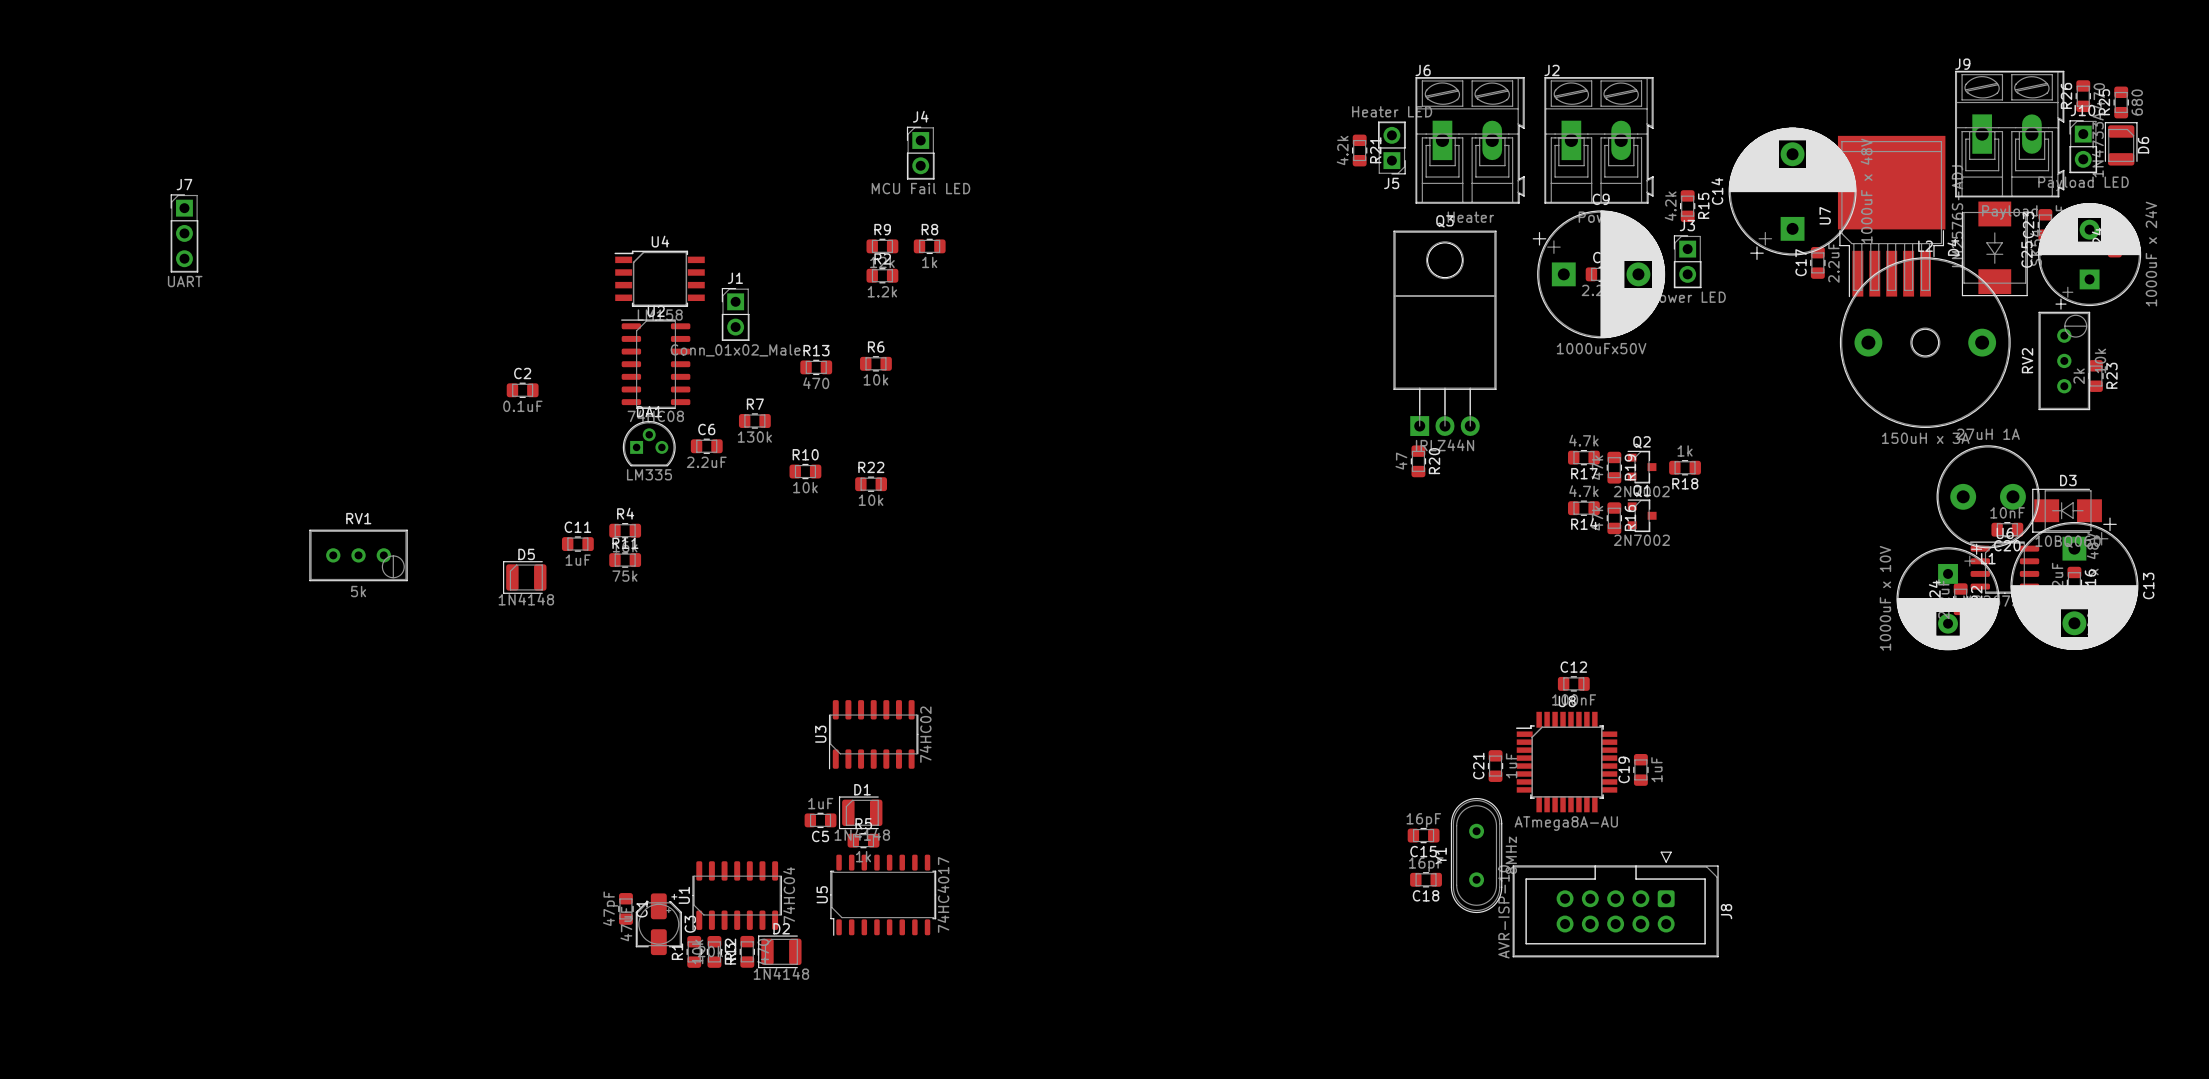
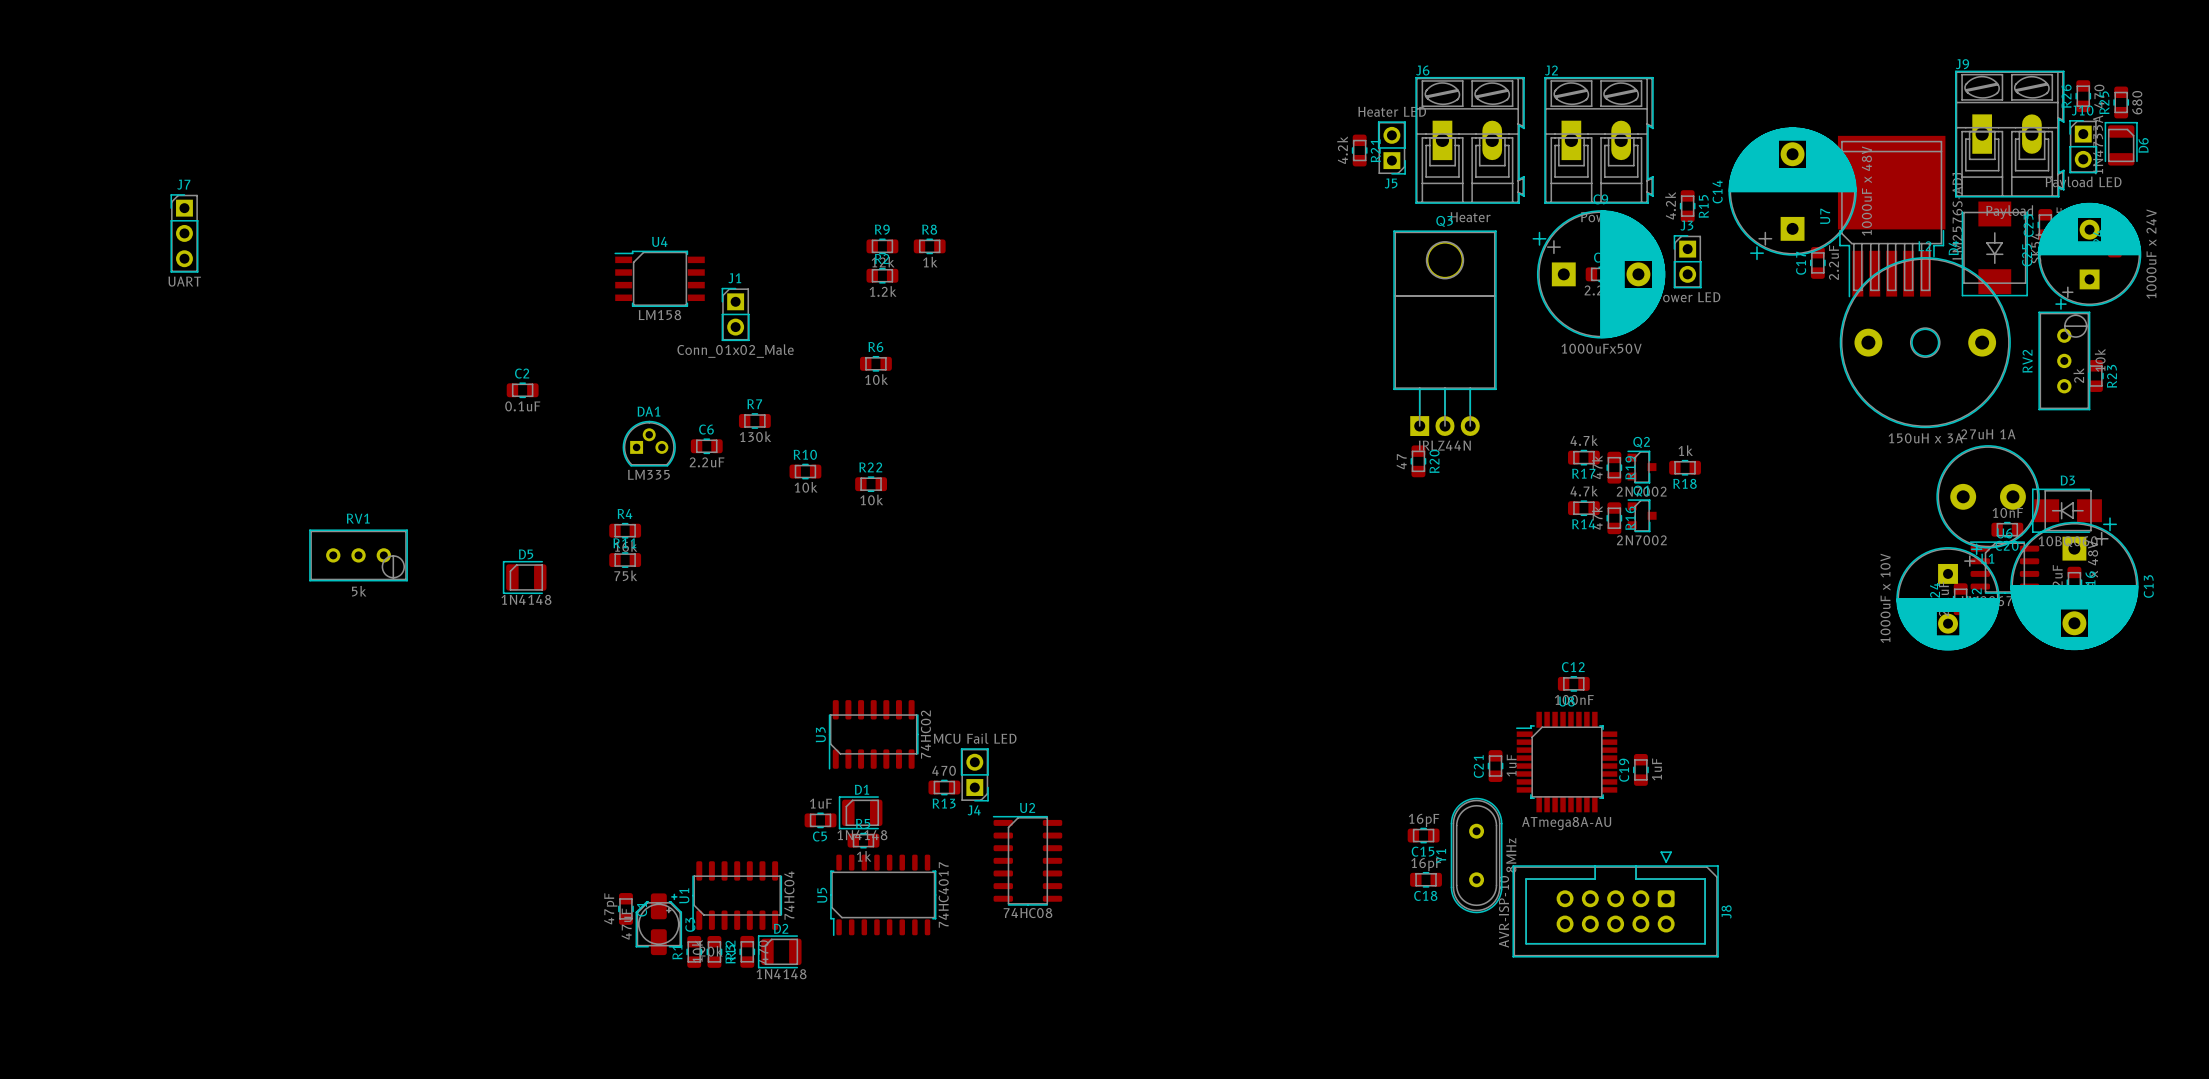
J4 rotation: 0° (920, 153) -> 180° (974, 774)
J4 position: (920, 153) -> (974, 774)
R13 name position: R13 (816, 350) -> R13 (944, 803)
U2 position: (655, 364) -> (1027, 860)
R13 position: (816, 367) -> (944, 787)
R13 value position: 470 (816, 383) -> 470 (944, 770)
C11: 1uF (577, 544) -> none

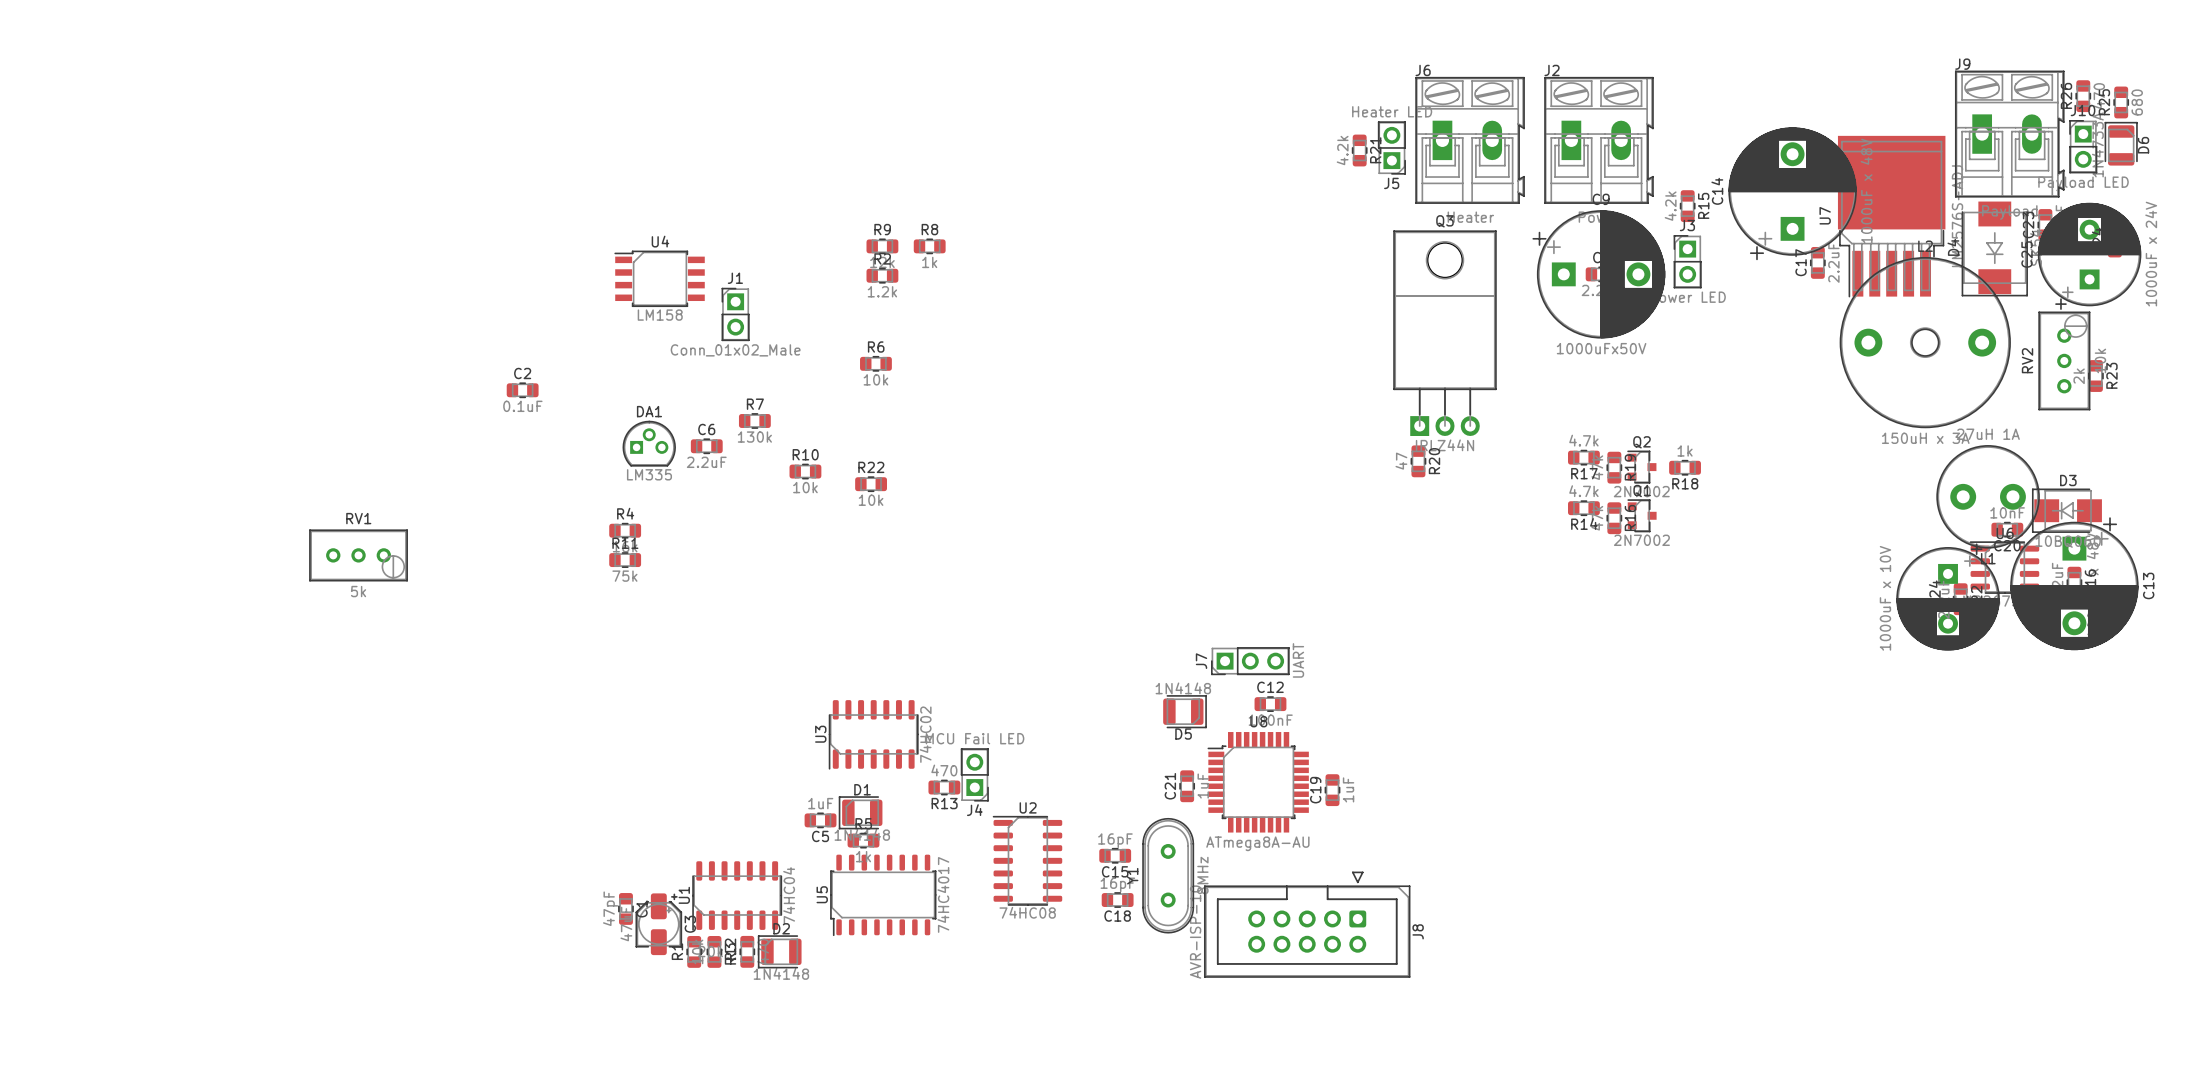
J7 rotation: 0° (184, 233) -> 90° counterclockwise (1250, 661)
J7 position: (184, 233) -> (1250, 661)
D5 rotation: 0° (524, 577) -> 180° (1184, 711)
D5 position: (524, 577) -> (1184, 711)
C12 position: (1573, 683) -> (1270, 704)
U8 position: (1566, 762) -> (1258, 782)
C21 position: (1495, 766) -> (1187, 786)
C19 position: (1640, 769) -> (1332, 790)
C15 position: (1423, 835) -> (1115, 855)
Y1 position: (1476, 855) -> (1168, 875)
C18 position: (1426, 879) -> (1117, 900)
J8 position: (1615, 904) -> (1307, 924)

